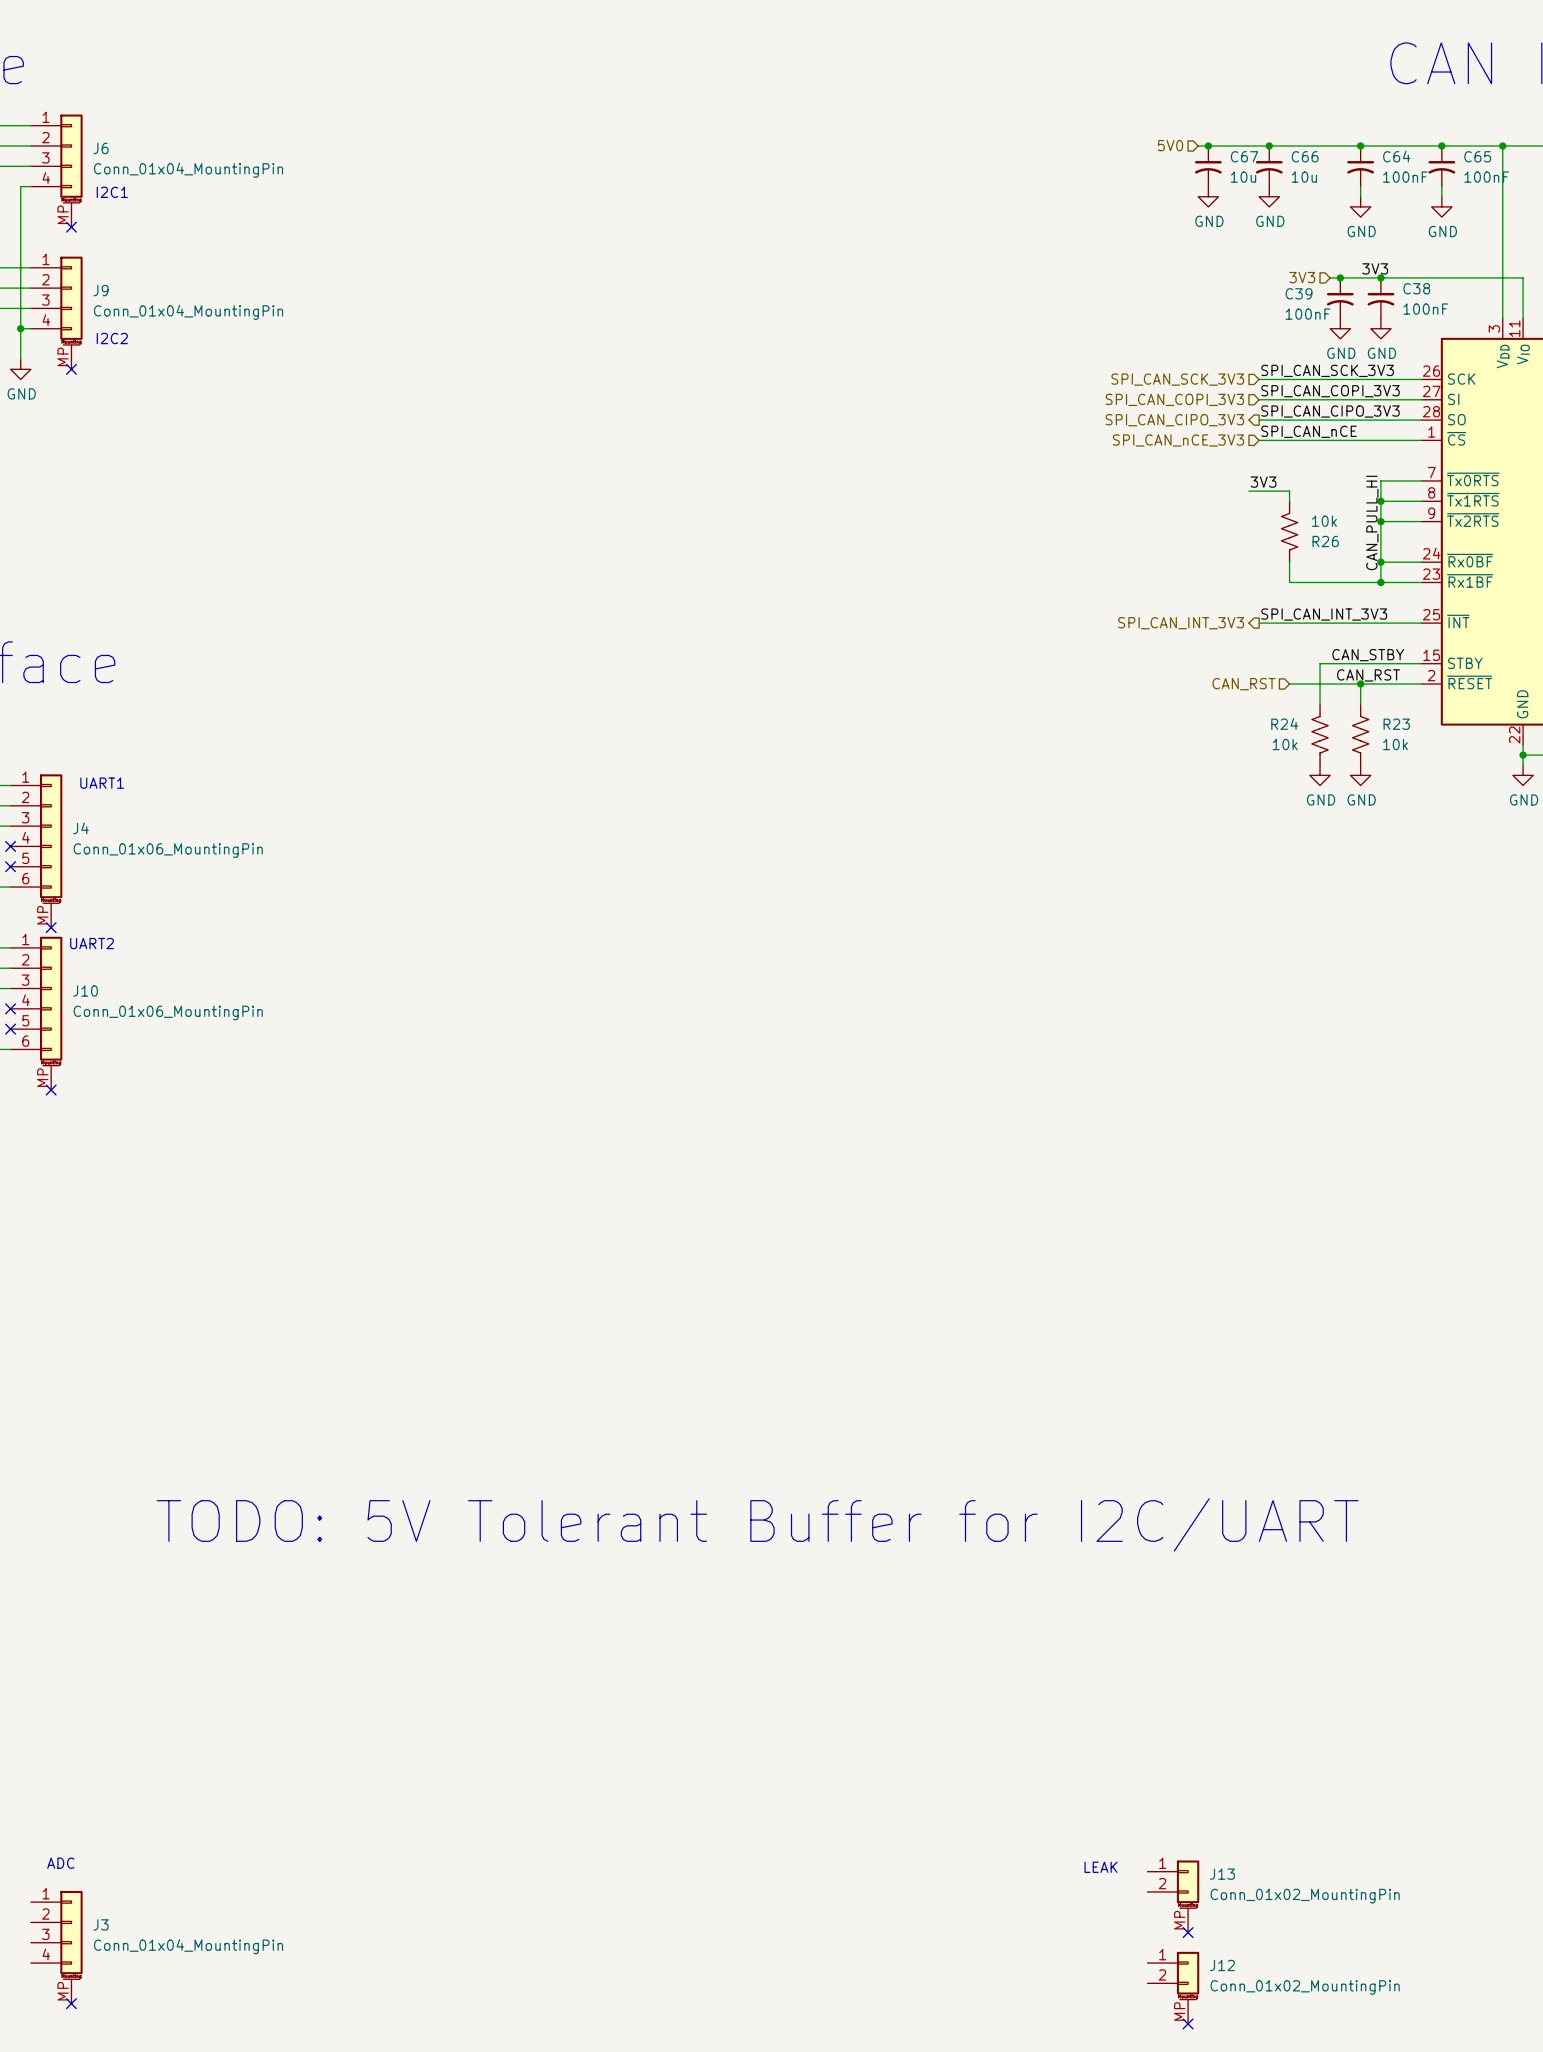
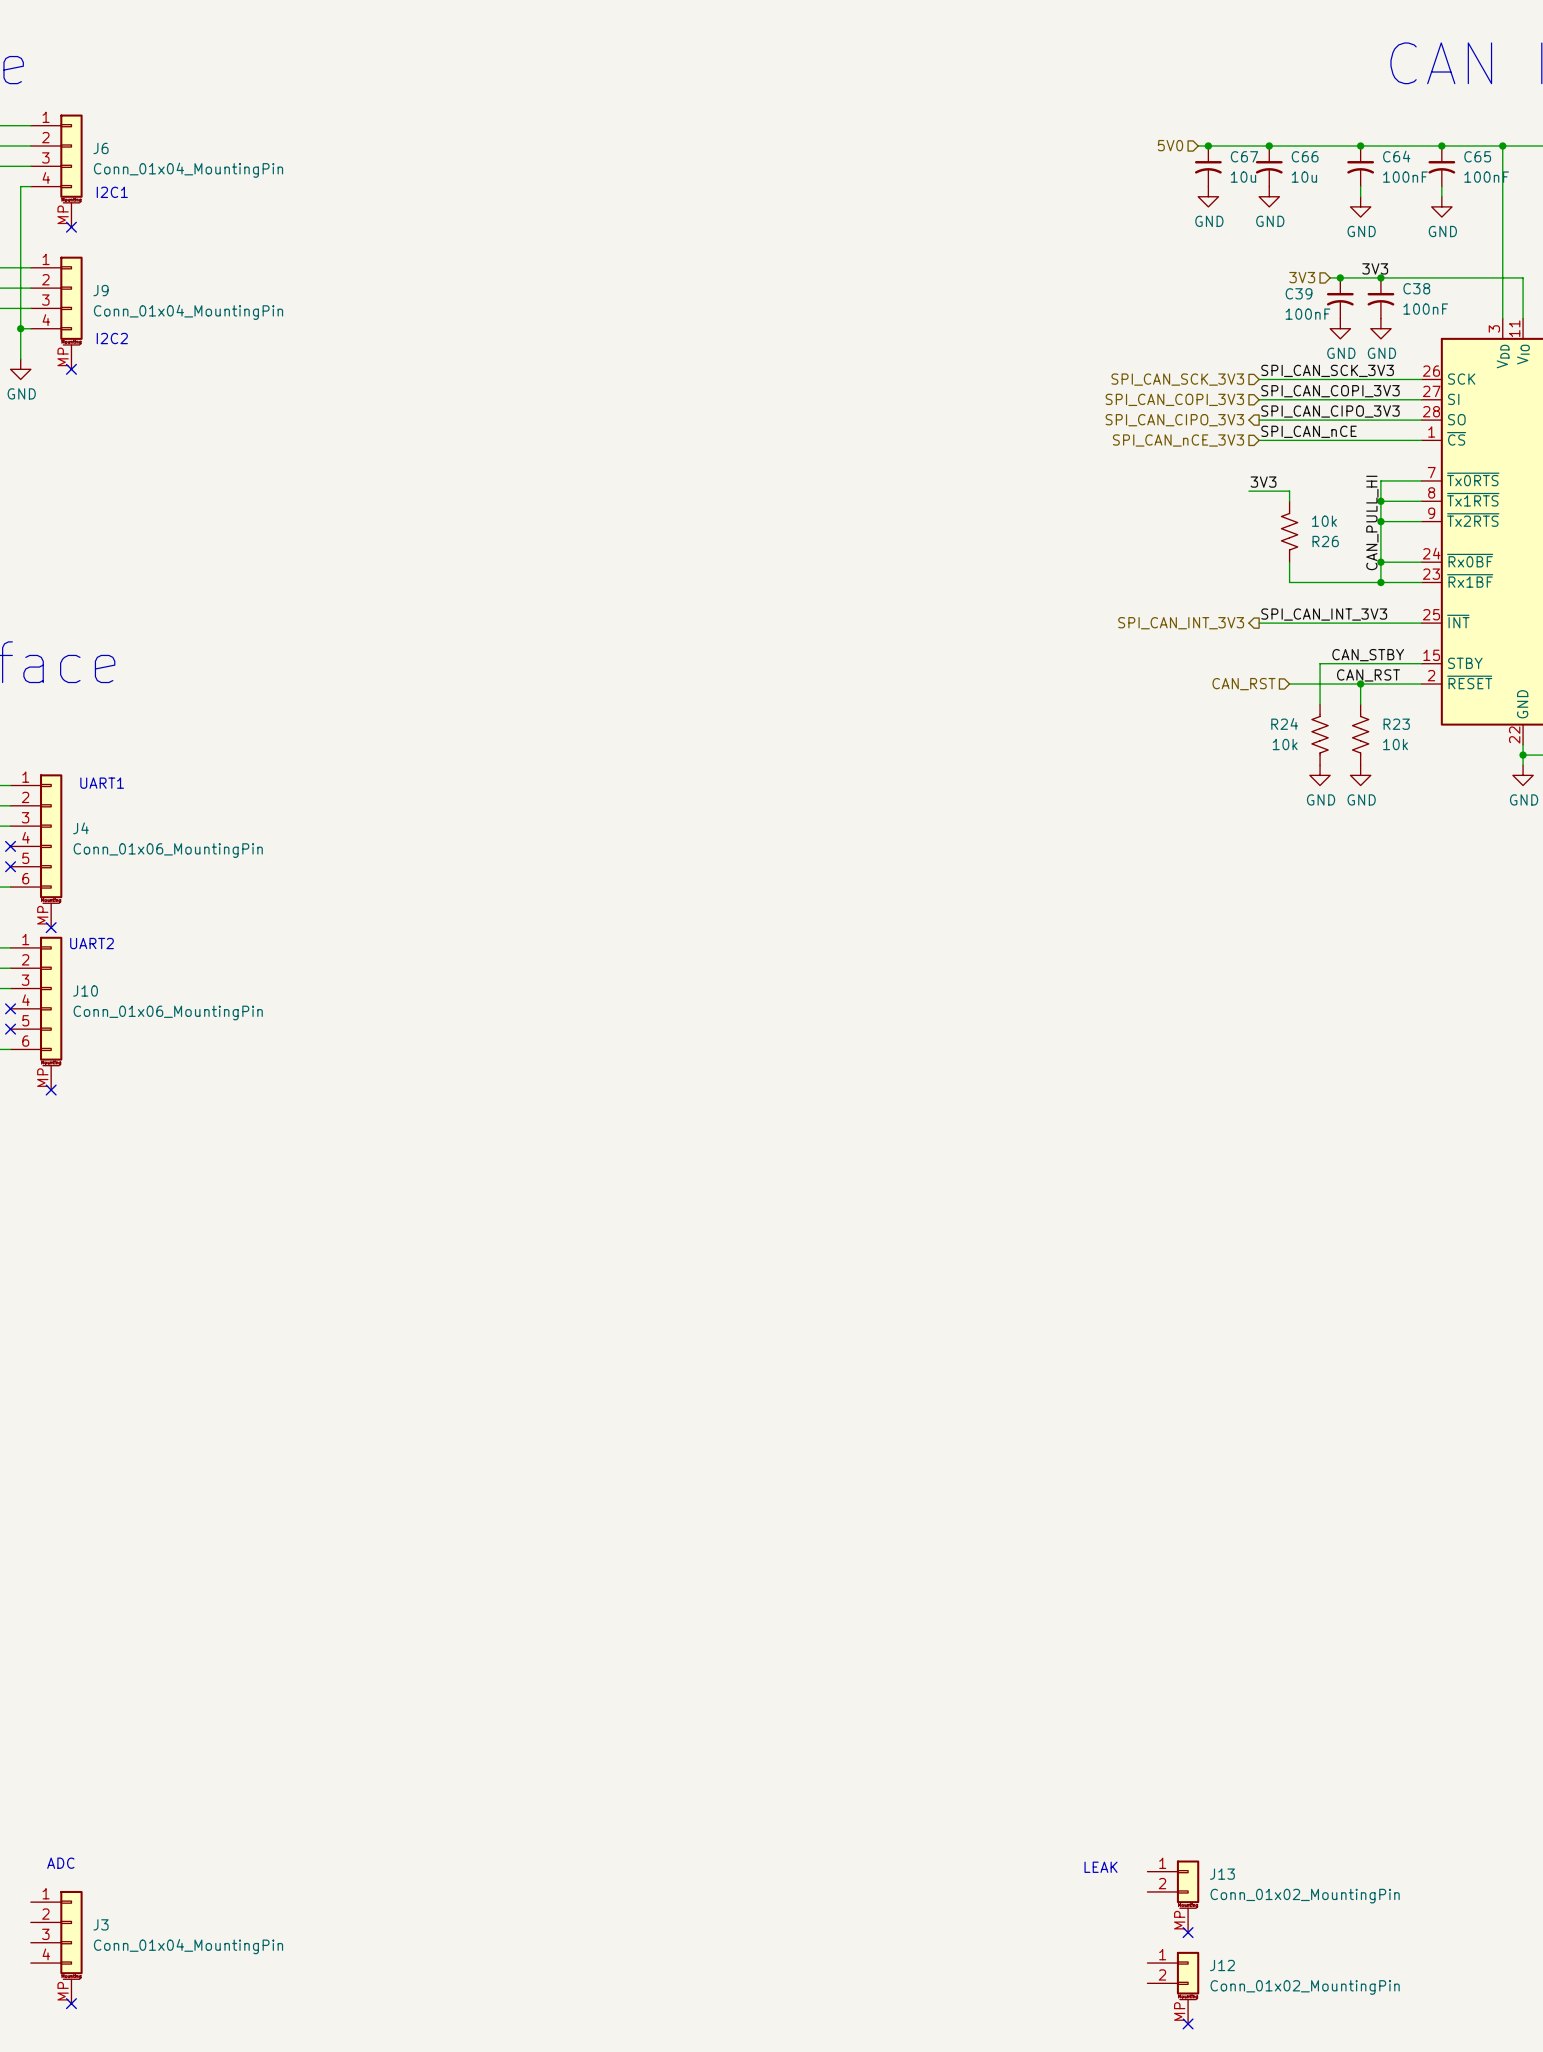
text: TODO: 5V Tolerant Buffer for I2C/UART (757, 1524) -> none

